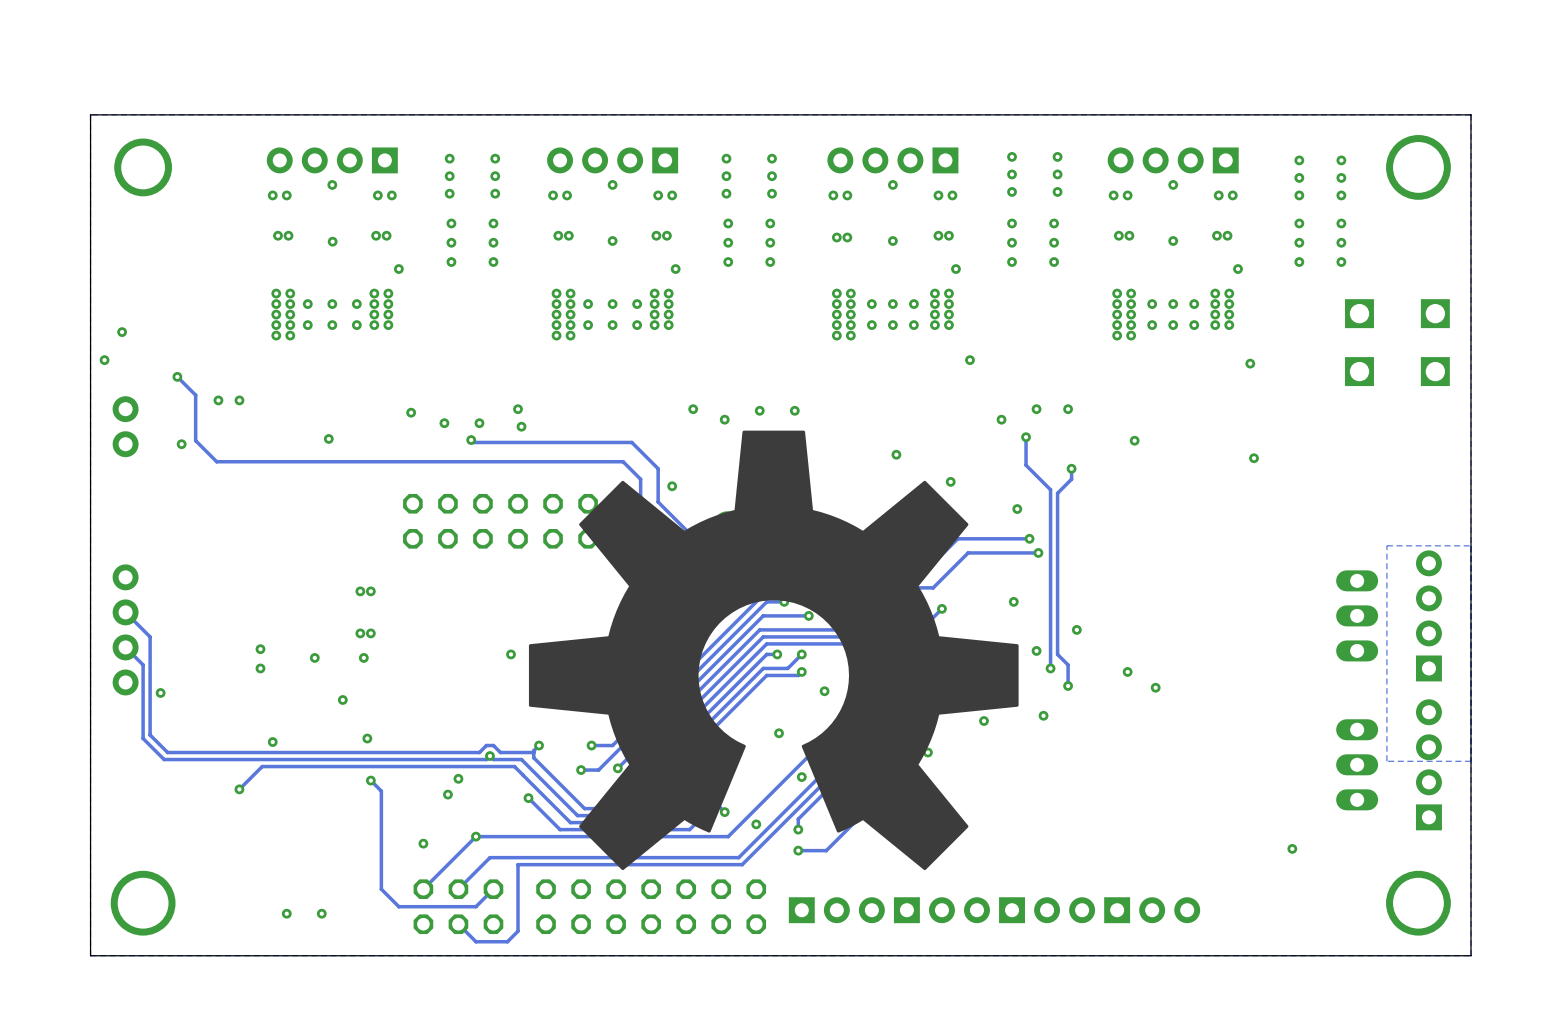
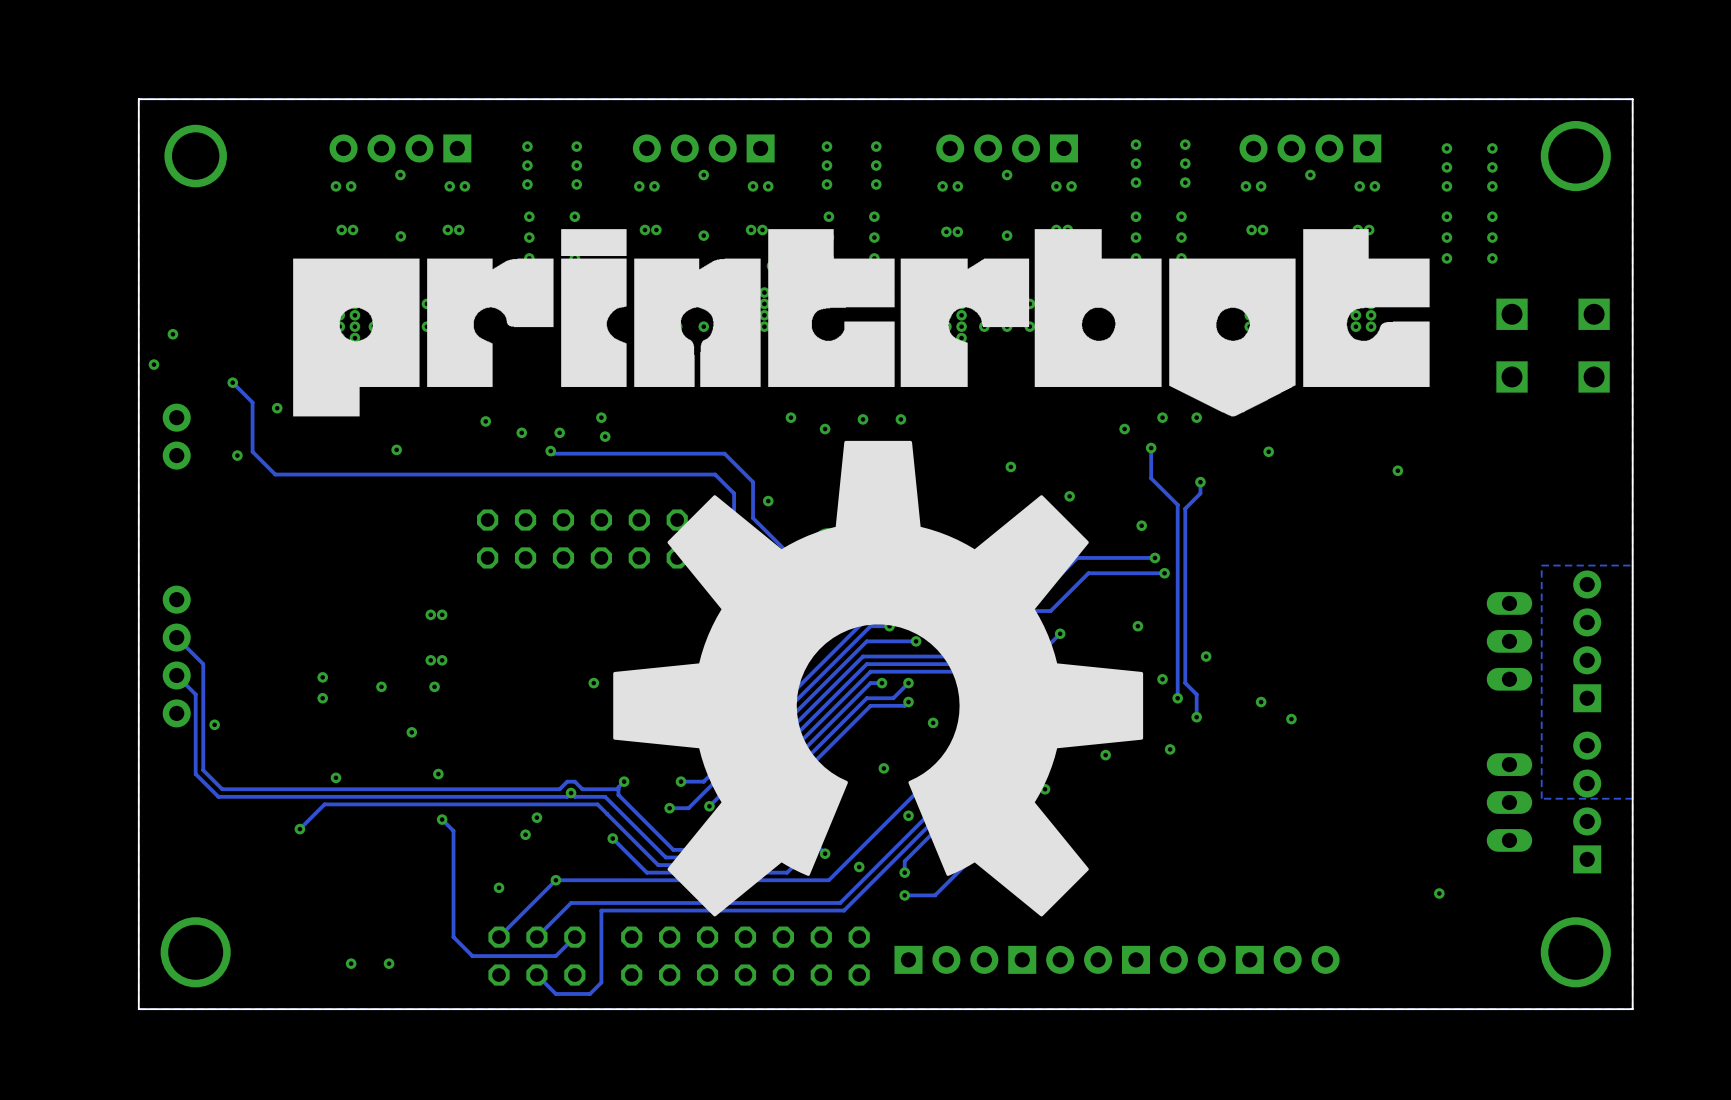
drawing: none -> [293, 229, 1430, 417]

